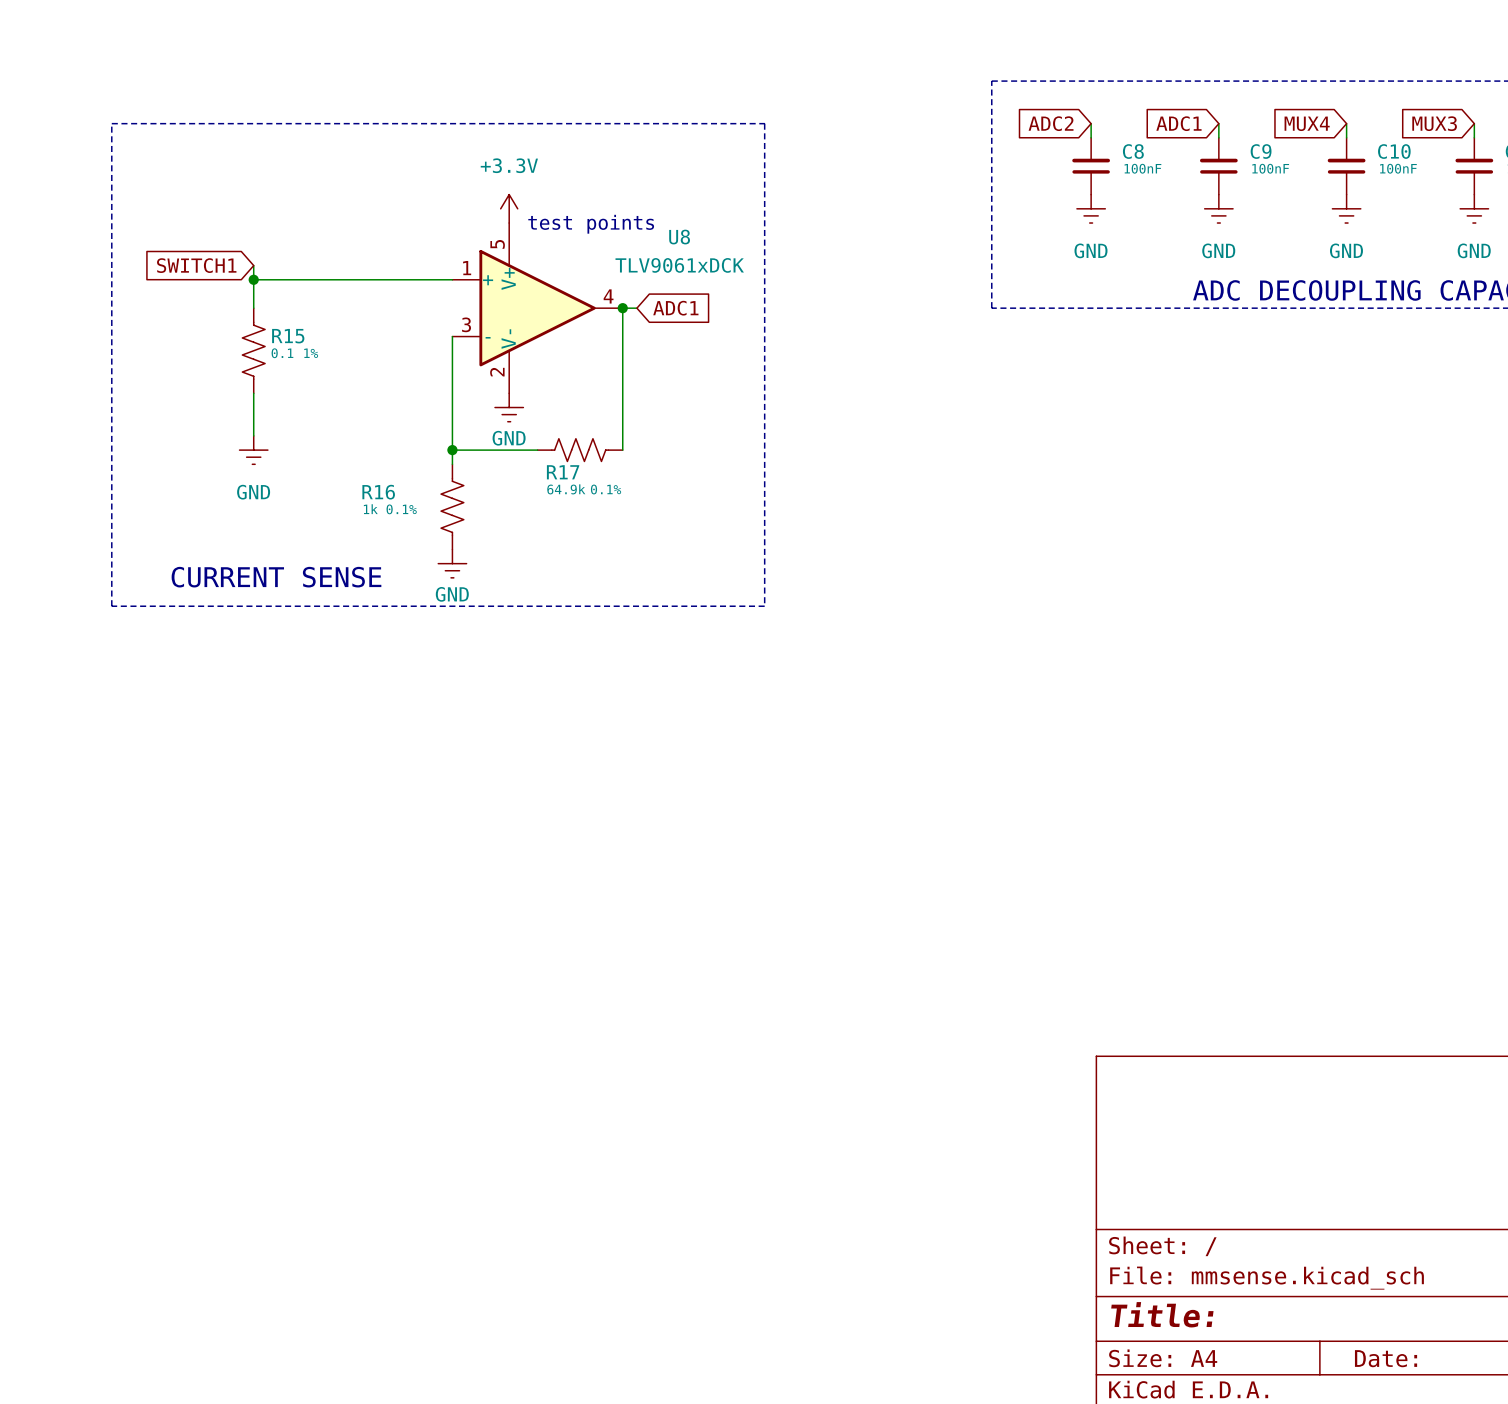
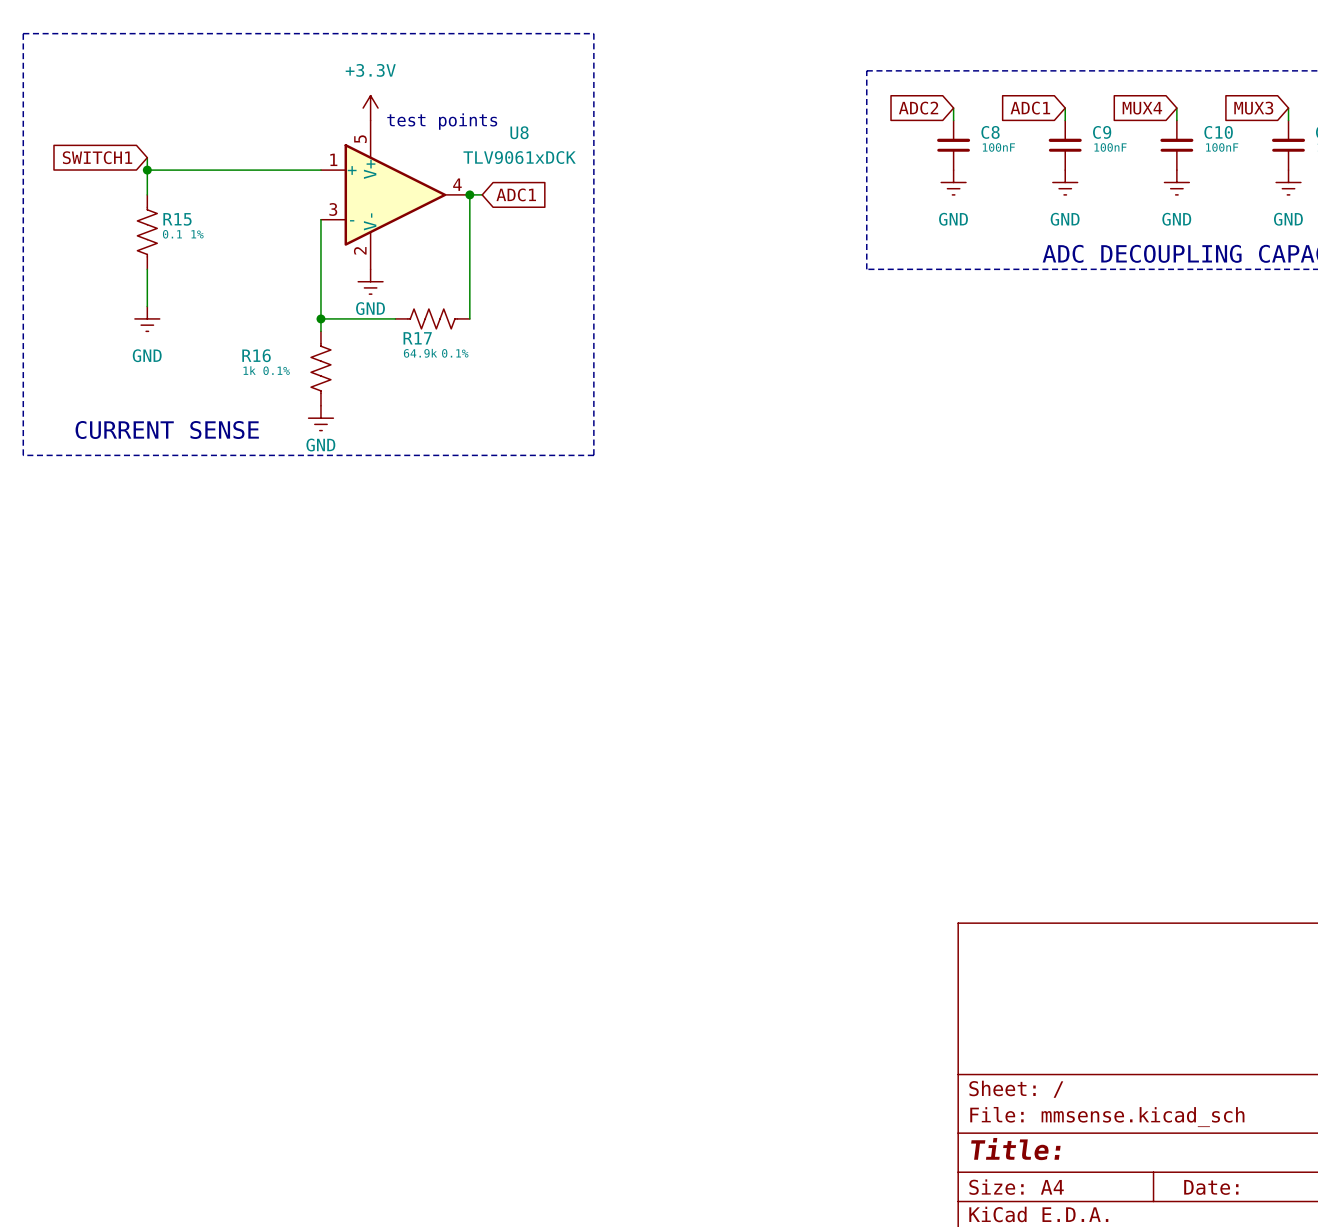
line: (111, 123) (764, 123) (764, 606) (111, 606) (111, 123) -> (23, 33) (593, 33) (593, 455) (23, 455) (23, 33)
junction: none -> (147, 170)
power symbol position: +3.3V (509, 208) -> +3.3V (370, 108)
junction: none -> (469, 194)
text position: test points (591, 224) -> test points (442, 121)
global label position: SWITCH1 (196, 265) -> SWITCH1 (97, 157)
wire: (253, 265) (253, 308) -> (147, 157) (147, 194)
wire: (253, 279) (452, 279) -> (147, 170) (320, 170)
junction: (253, 279) -> none
U8 position: (537, 308) -> (395, 194)
junction: (622, 308) -> none
wire: (636, 308) (622, 308) (622, 450) -> (482, 194) (469, 194) (469, 318)
global label position: ADC1 (675, 308) -> ADC1 (516, 194)
power symbol: none -> GND (370, 281)
wire: (452, 336) (452, 464) -> (320, 219) (320, 331)
R15 position: (253, 350) -> (147, 232)
power symbol: none -> GND (147, 318)
junction: none -> (320, 318)
wire: (253, 393) (253, 435) -> (147, 269) (147, 306)
power symbol: GND (509, 407) -> none
power symbol: GND (253, 450) -> none
wire: (452, 450) (537, 450) -> (320, 318) (395, 318)
junction: (452, 450) -> none
R17 position: (580, 450) -> (432, 318)
power symbol: none -> GND (320, 418)
R16 position: (452, 506) -> (320, 368)
power symbol: GND (452, 563) -> none
text position: CURRENT SENSE (276, 577) -> CURRENT SENSE (167, 429)

